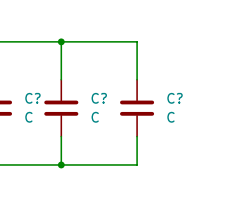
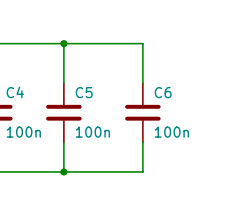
C? name: C? (32, 98) -> C4 (15, 92)
C? name: C? (99, 98) -> C5 (84, 92)
C? name: C? (175, 98) -> C6 (163, 92)
C? value: C (28, 117) -> 100n (23, 132)
C? value: C (95, 117) -> 100n (92, 132)
C? value: C (170, 117) -> 100n (171, 132)

